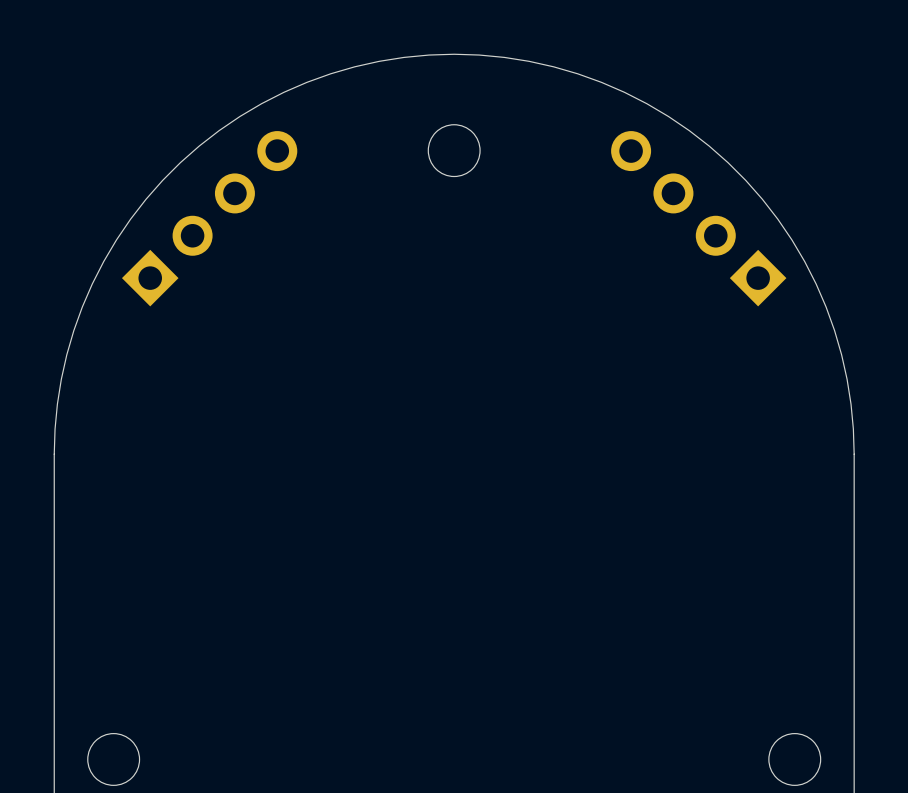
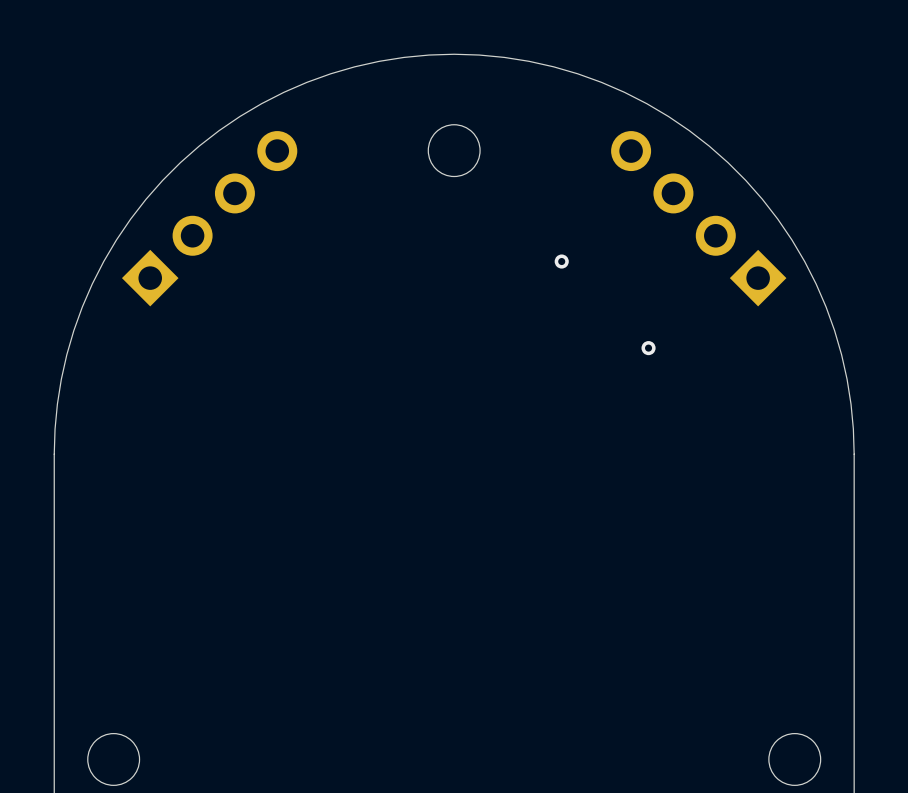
via: none -> (561, 261)
via: none -> (648, 348)

